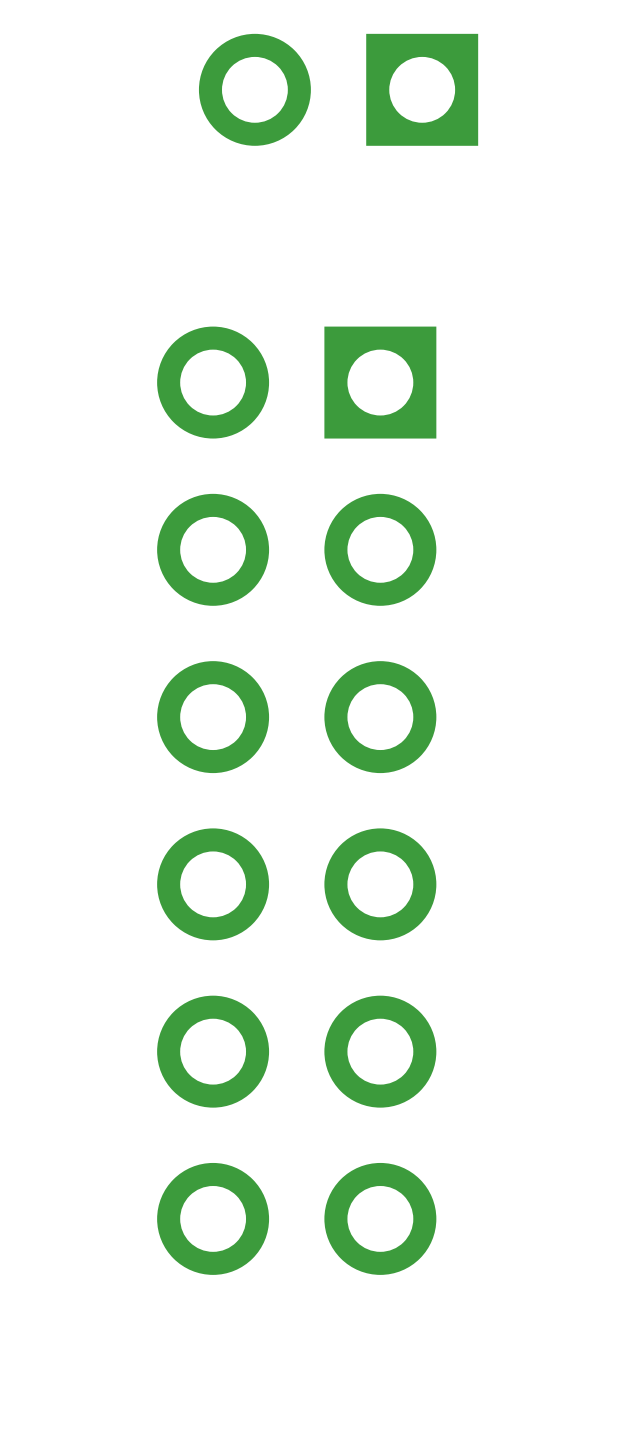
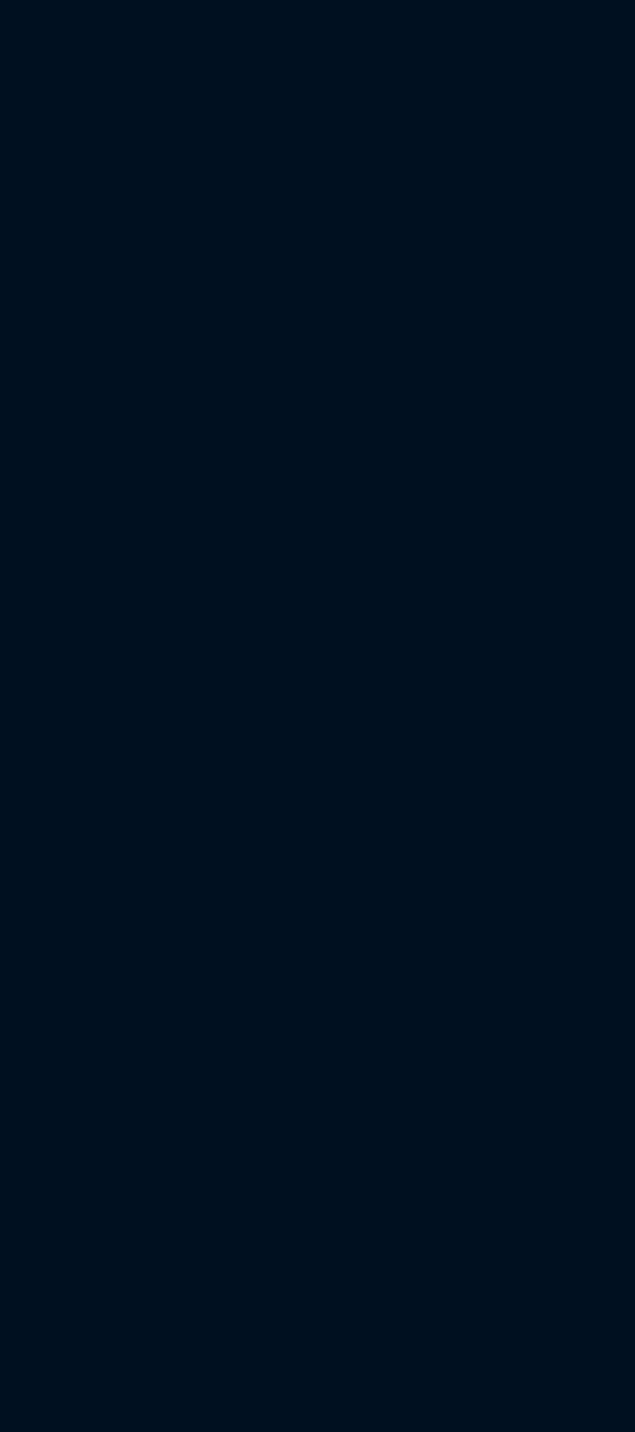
part: (338, 89) -> none
part: (296, 800) -> none

